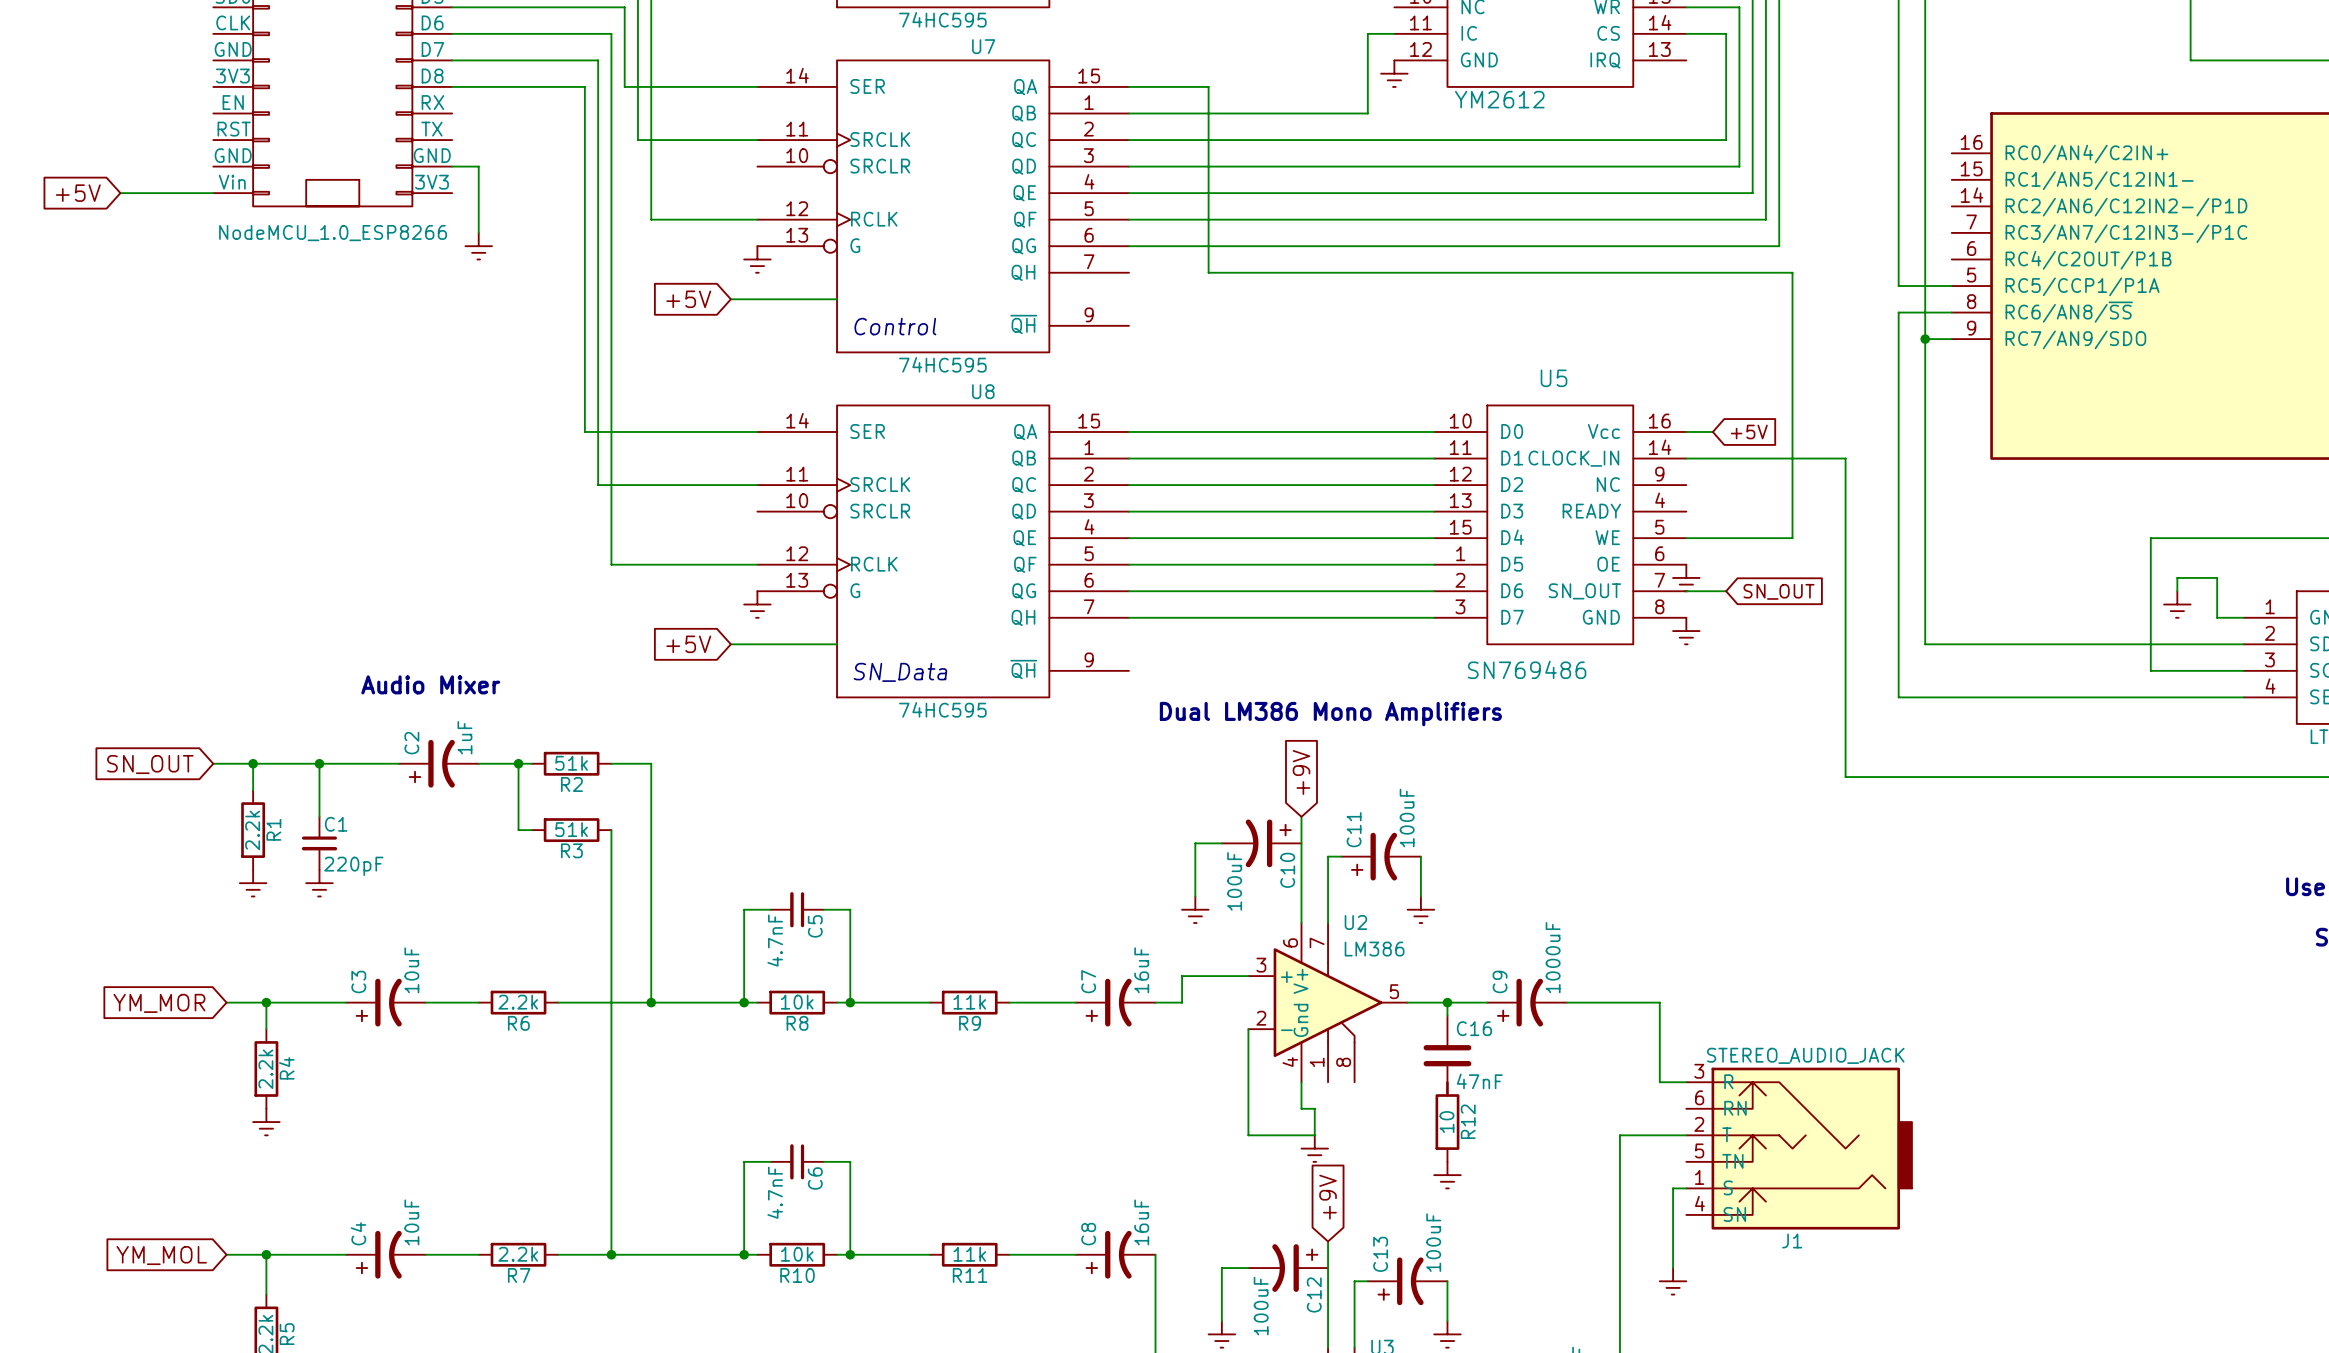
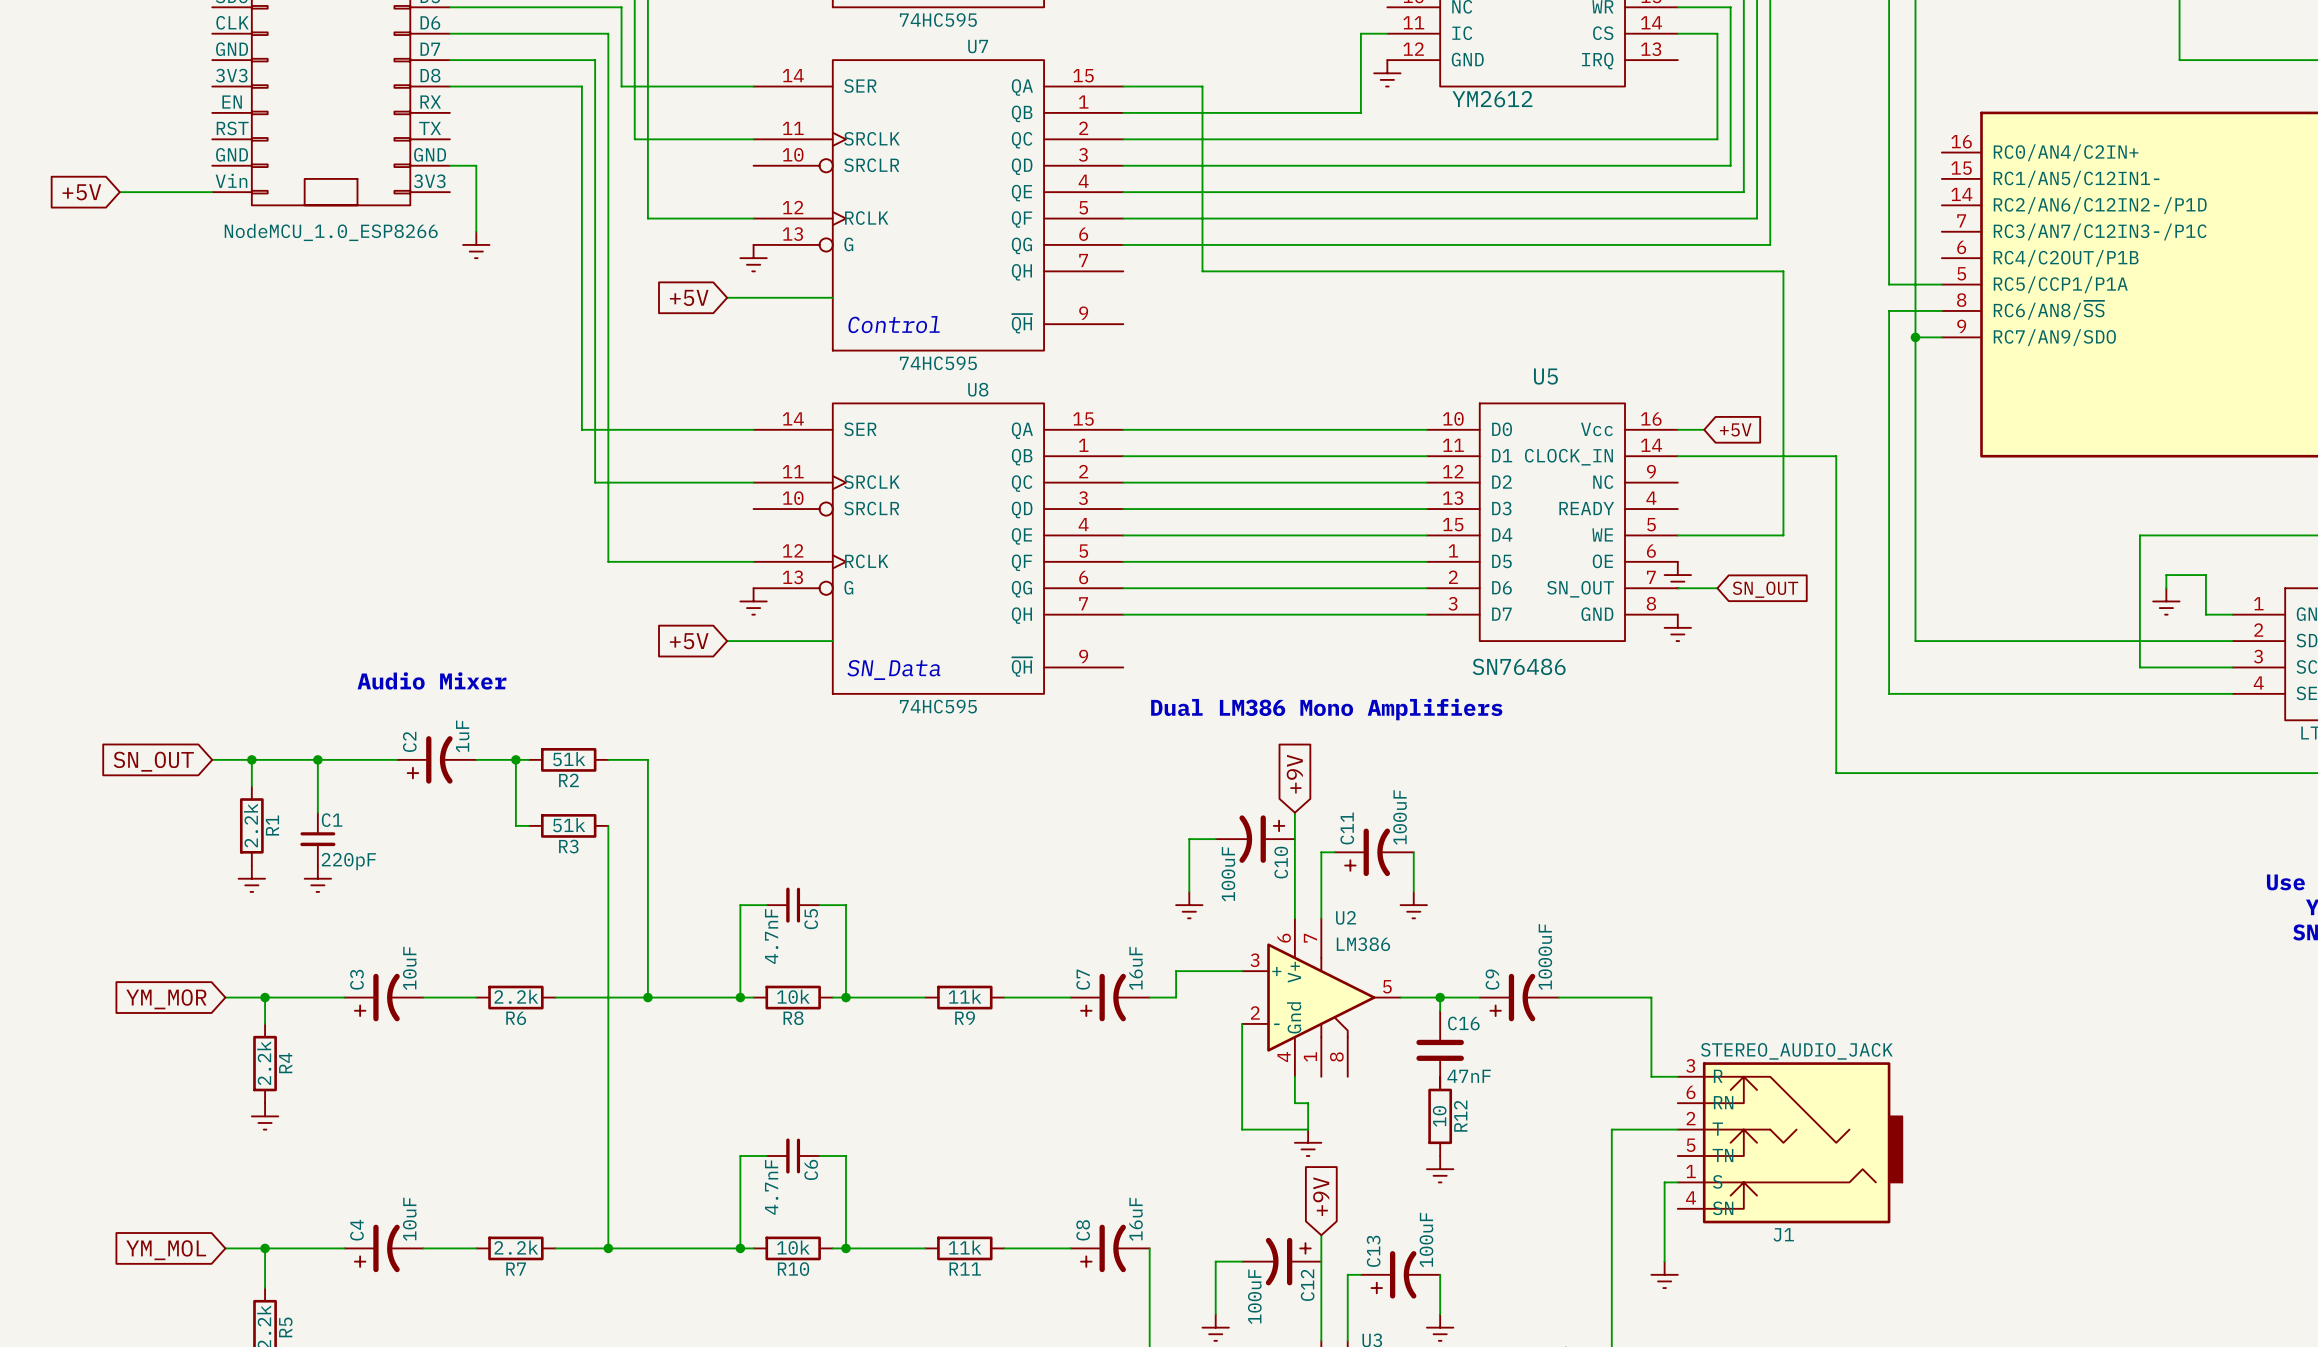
U5 value: SN769486 (1527, 669) -> SN76486 (1519, 666)

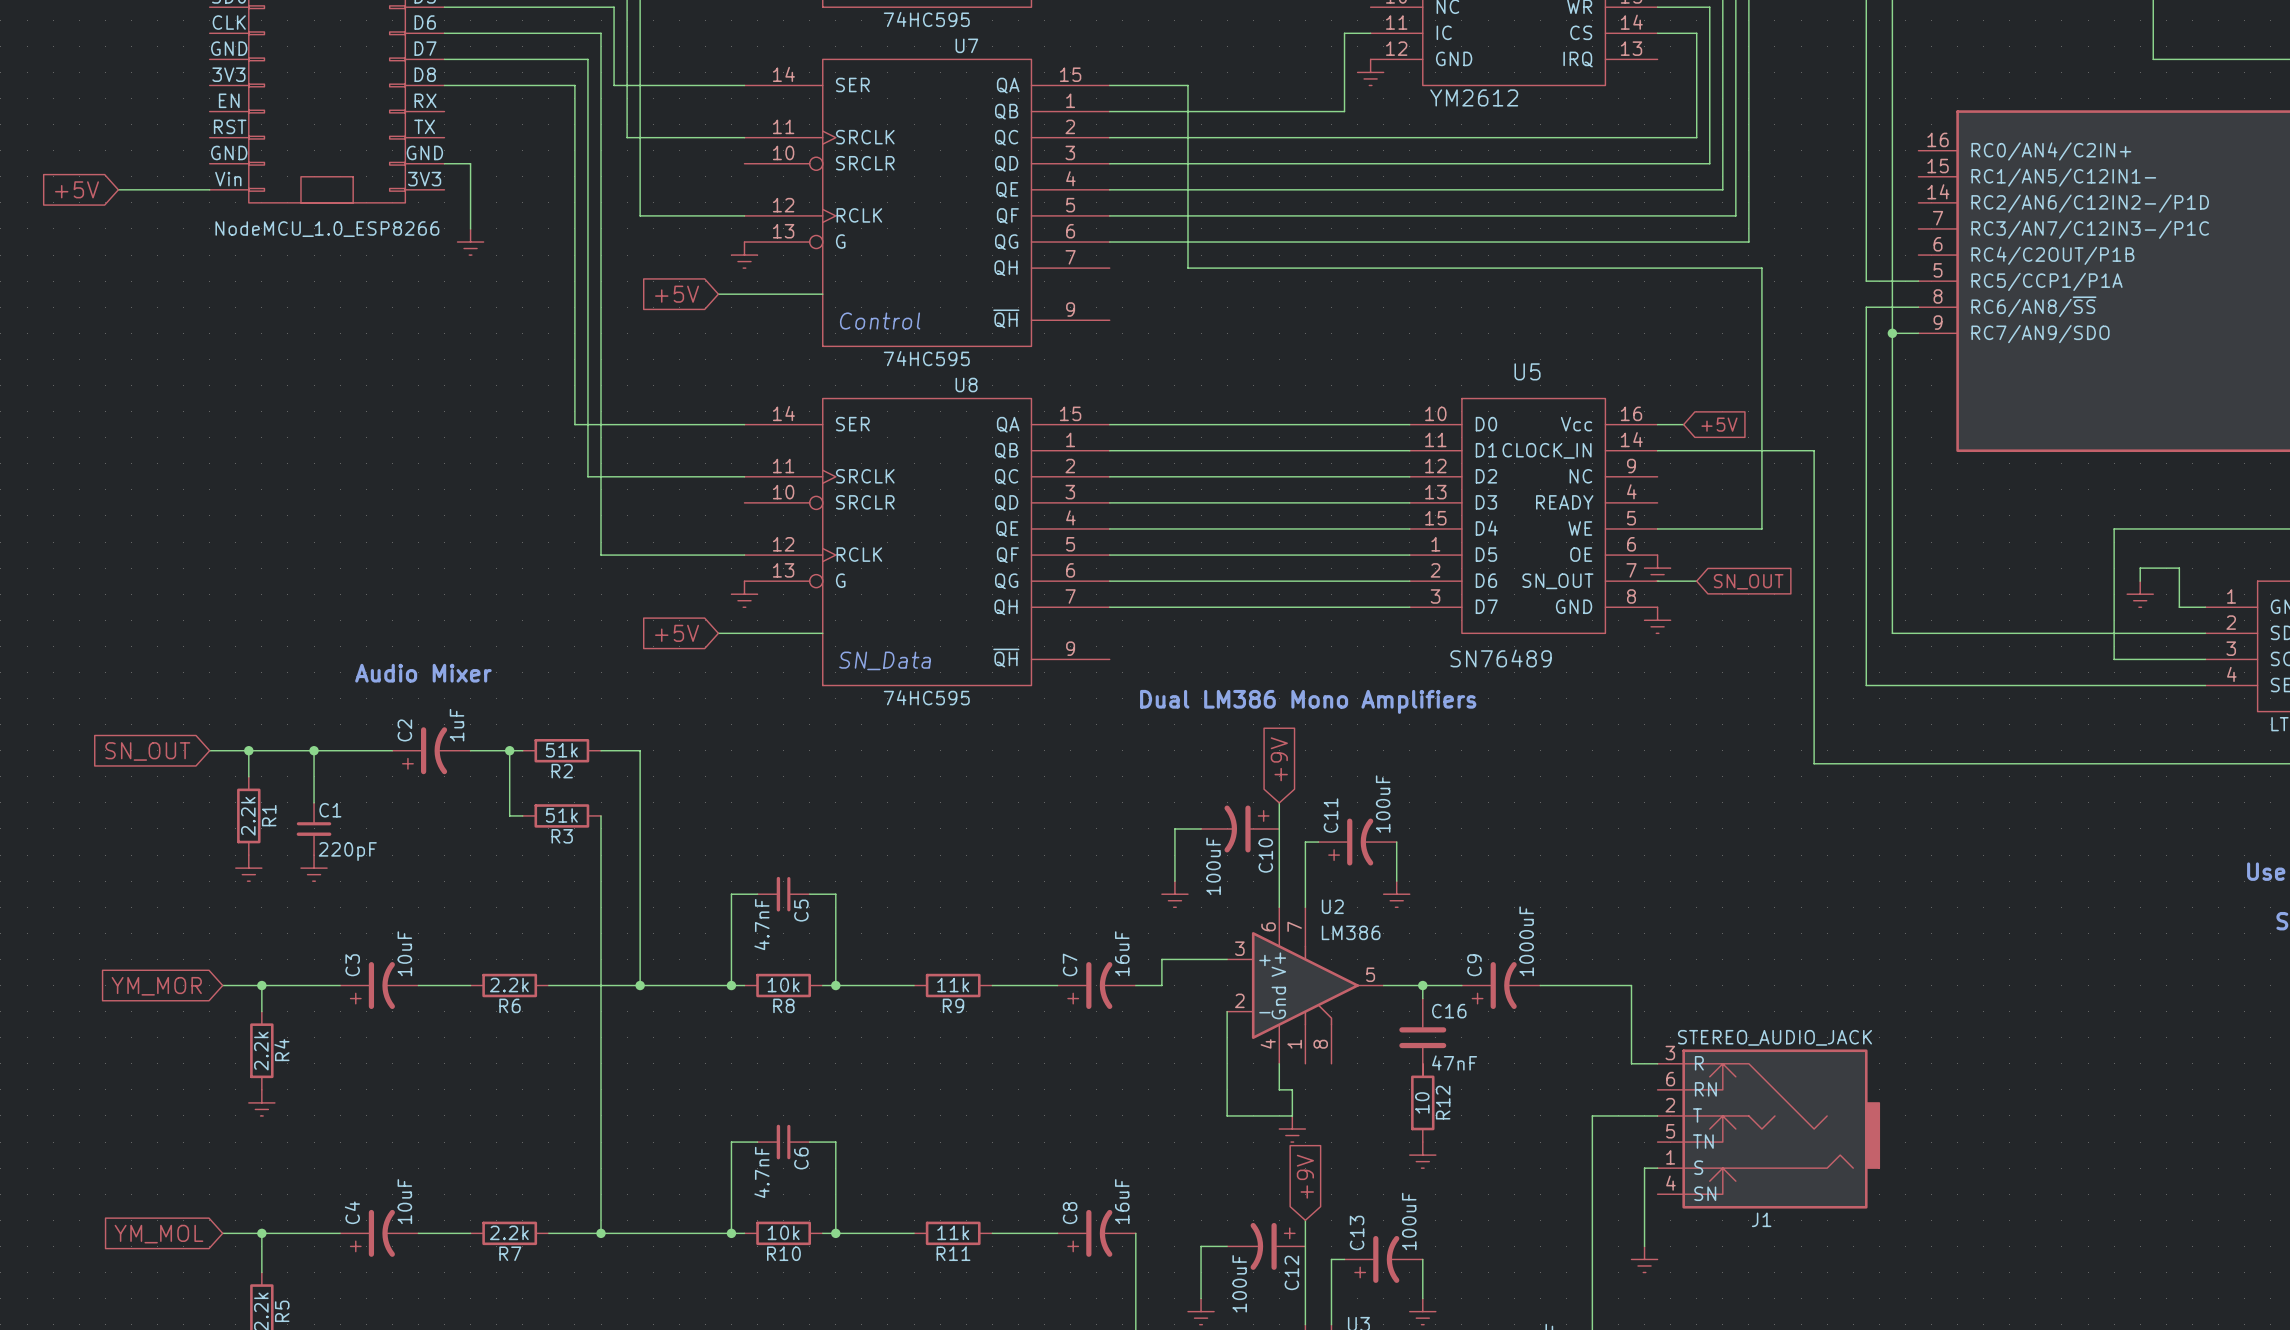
U5 value: SN76486 (1519, 666) -> SN76489 (1501, 658)

